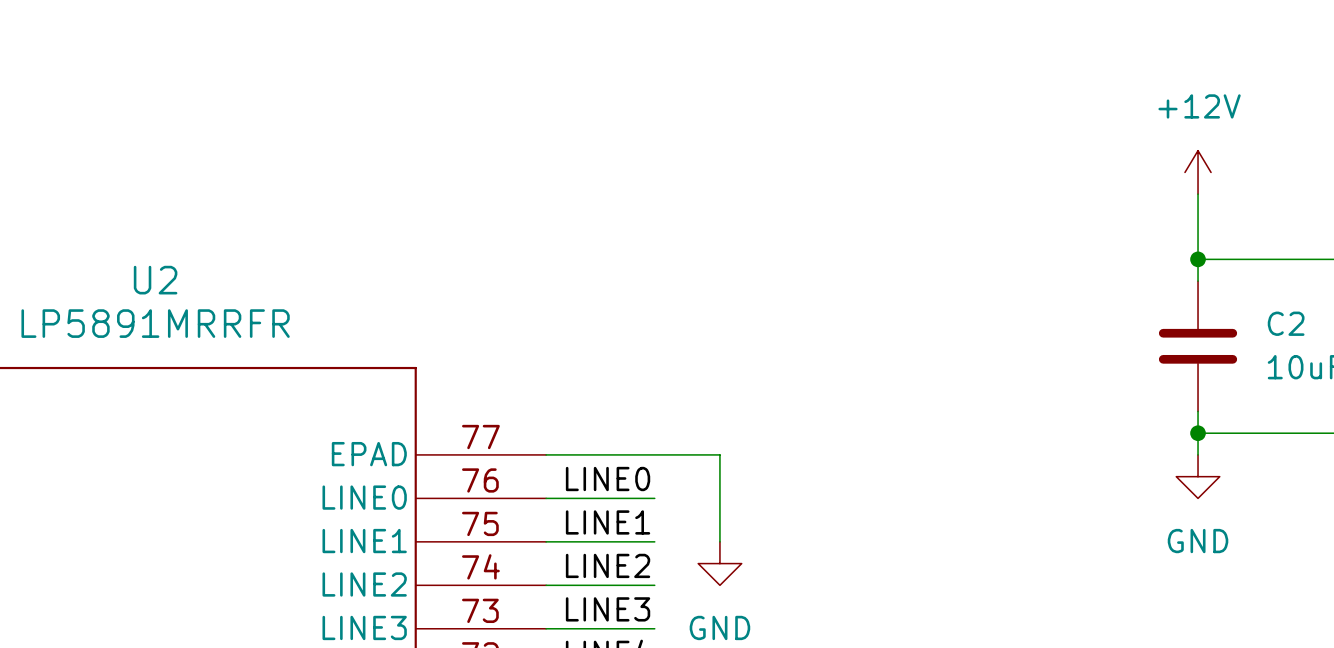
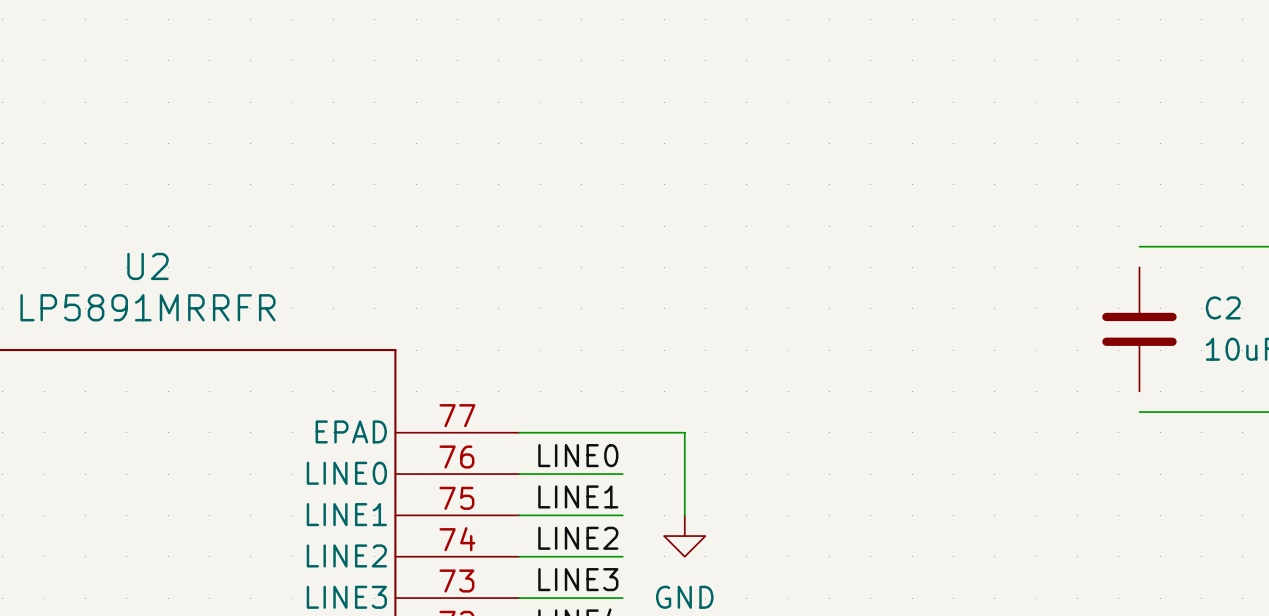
power symbol: +12V (1198, 172) -> none
wire: (1198, 194) (1198, 281) -> none
junction: (1198, 259) -> none
wire: (1198, 411) (1198, 454) -> none
junction: (1198, 433) -> none
power symbol: GND (1198, 476) -> none

